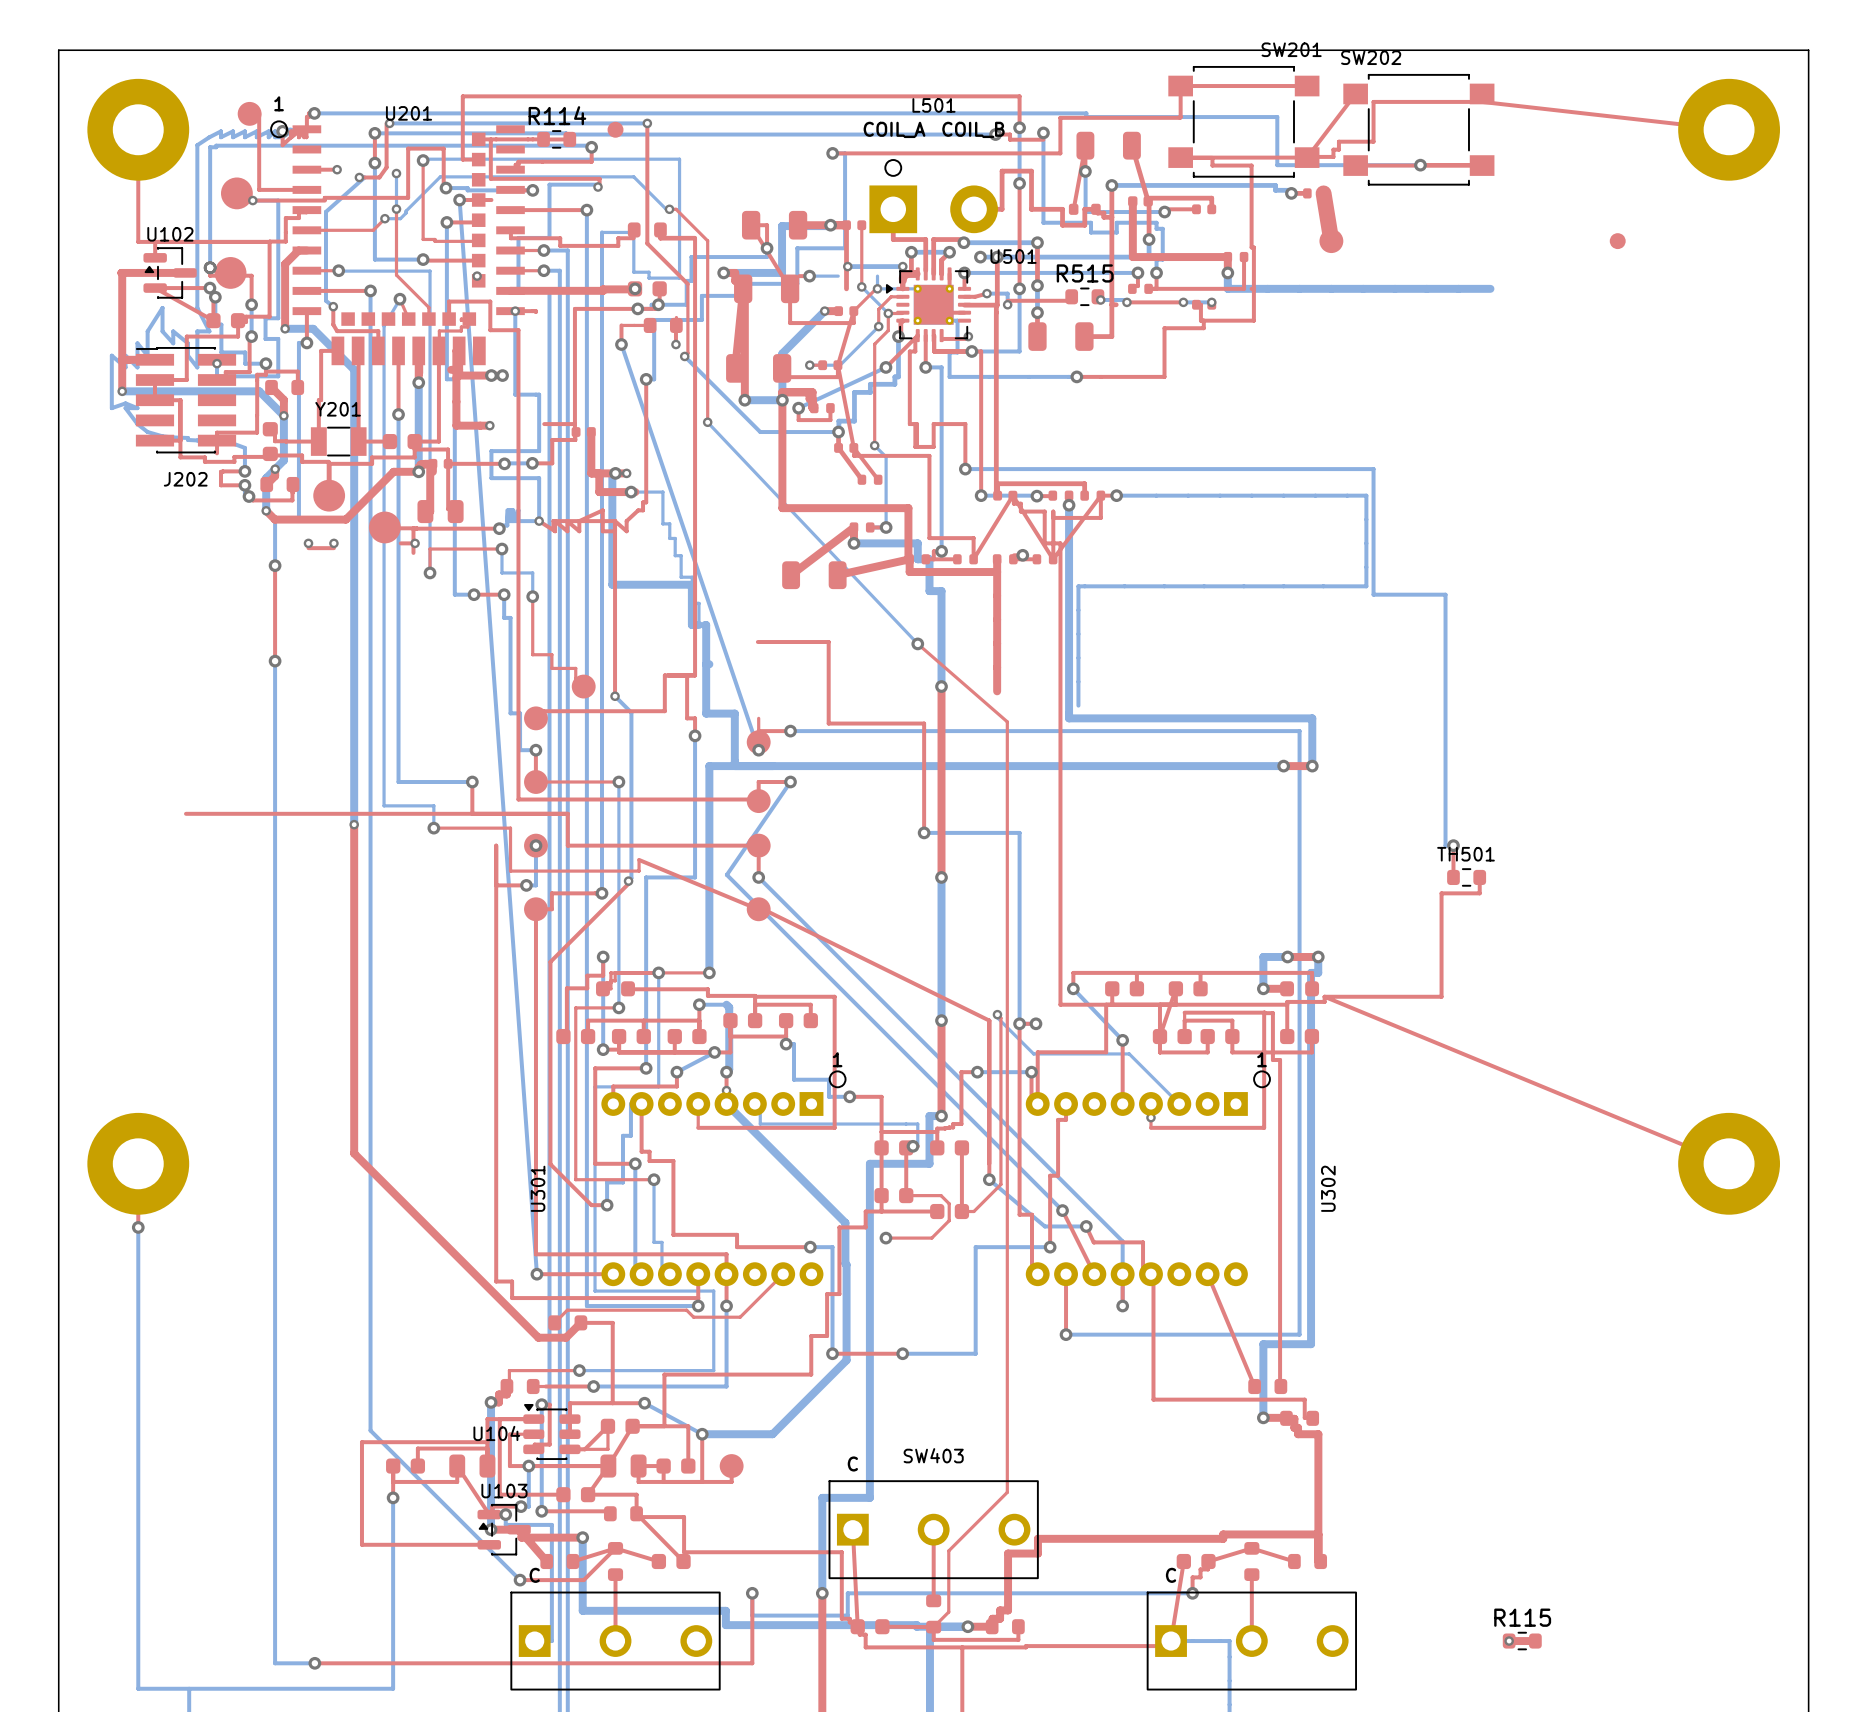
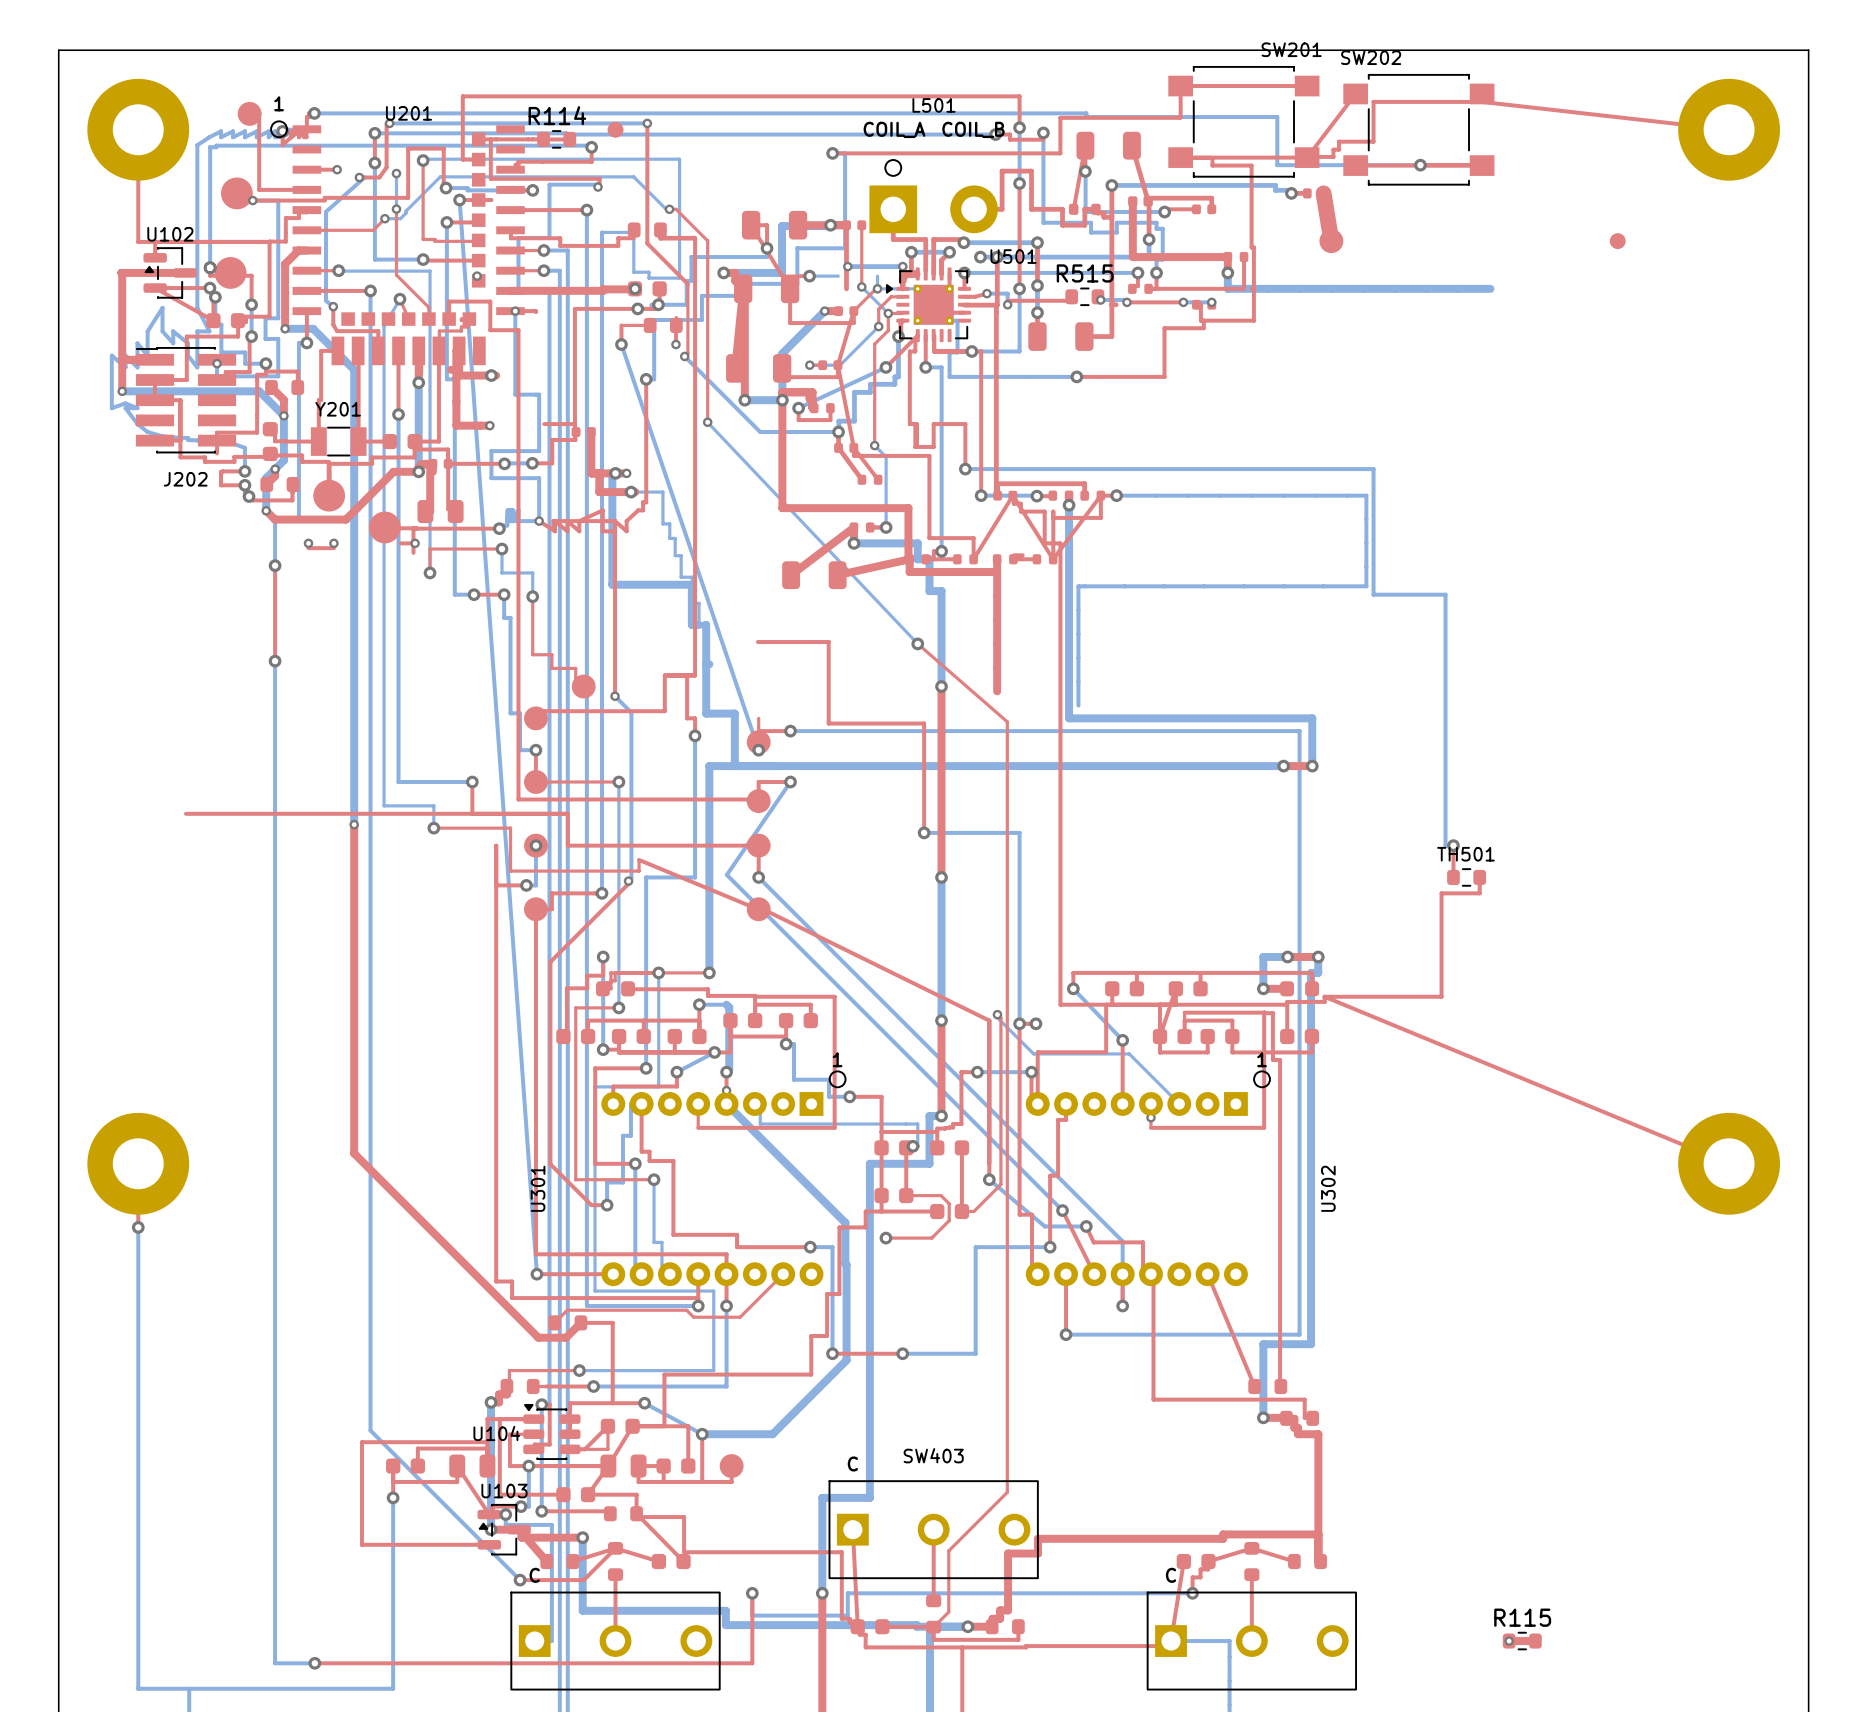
U501 footprint: [885, 267, 972, 343] -> [885, 267, 972, 343]
via: (968, 336) -> none
top track: (943, 338) (968, 338) -> none
via: (502, 375) -> none
via: (1022, 555) -> none

